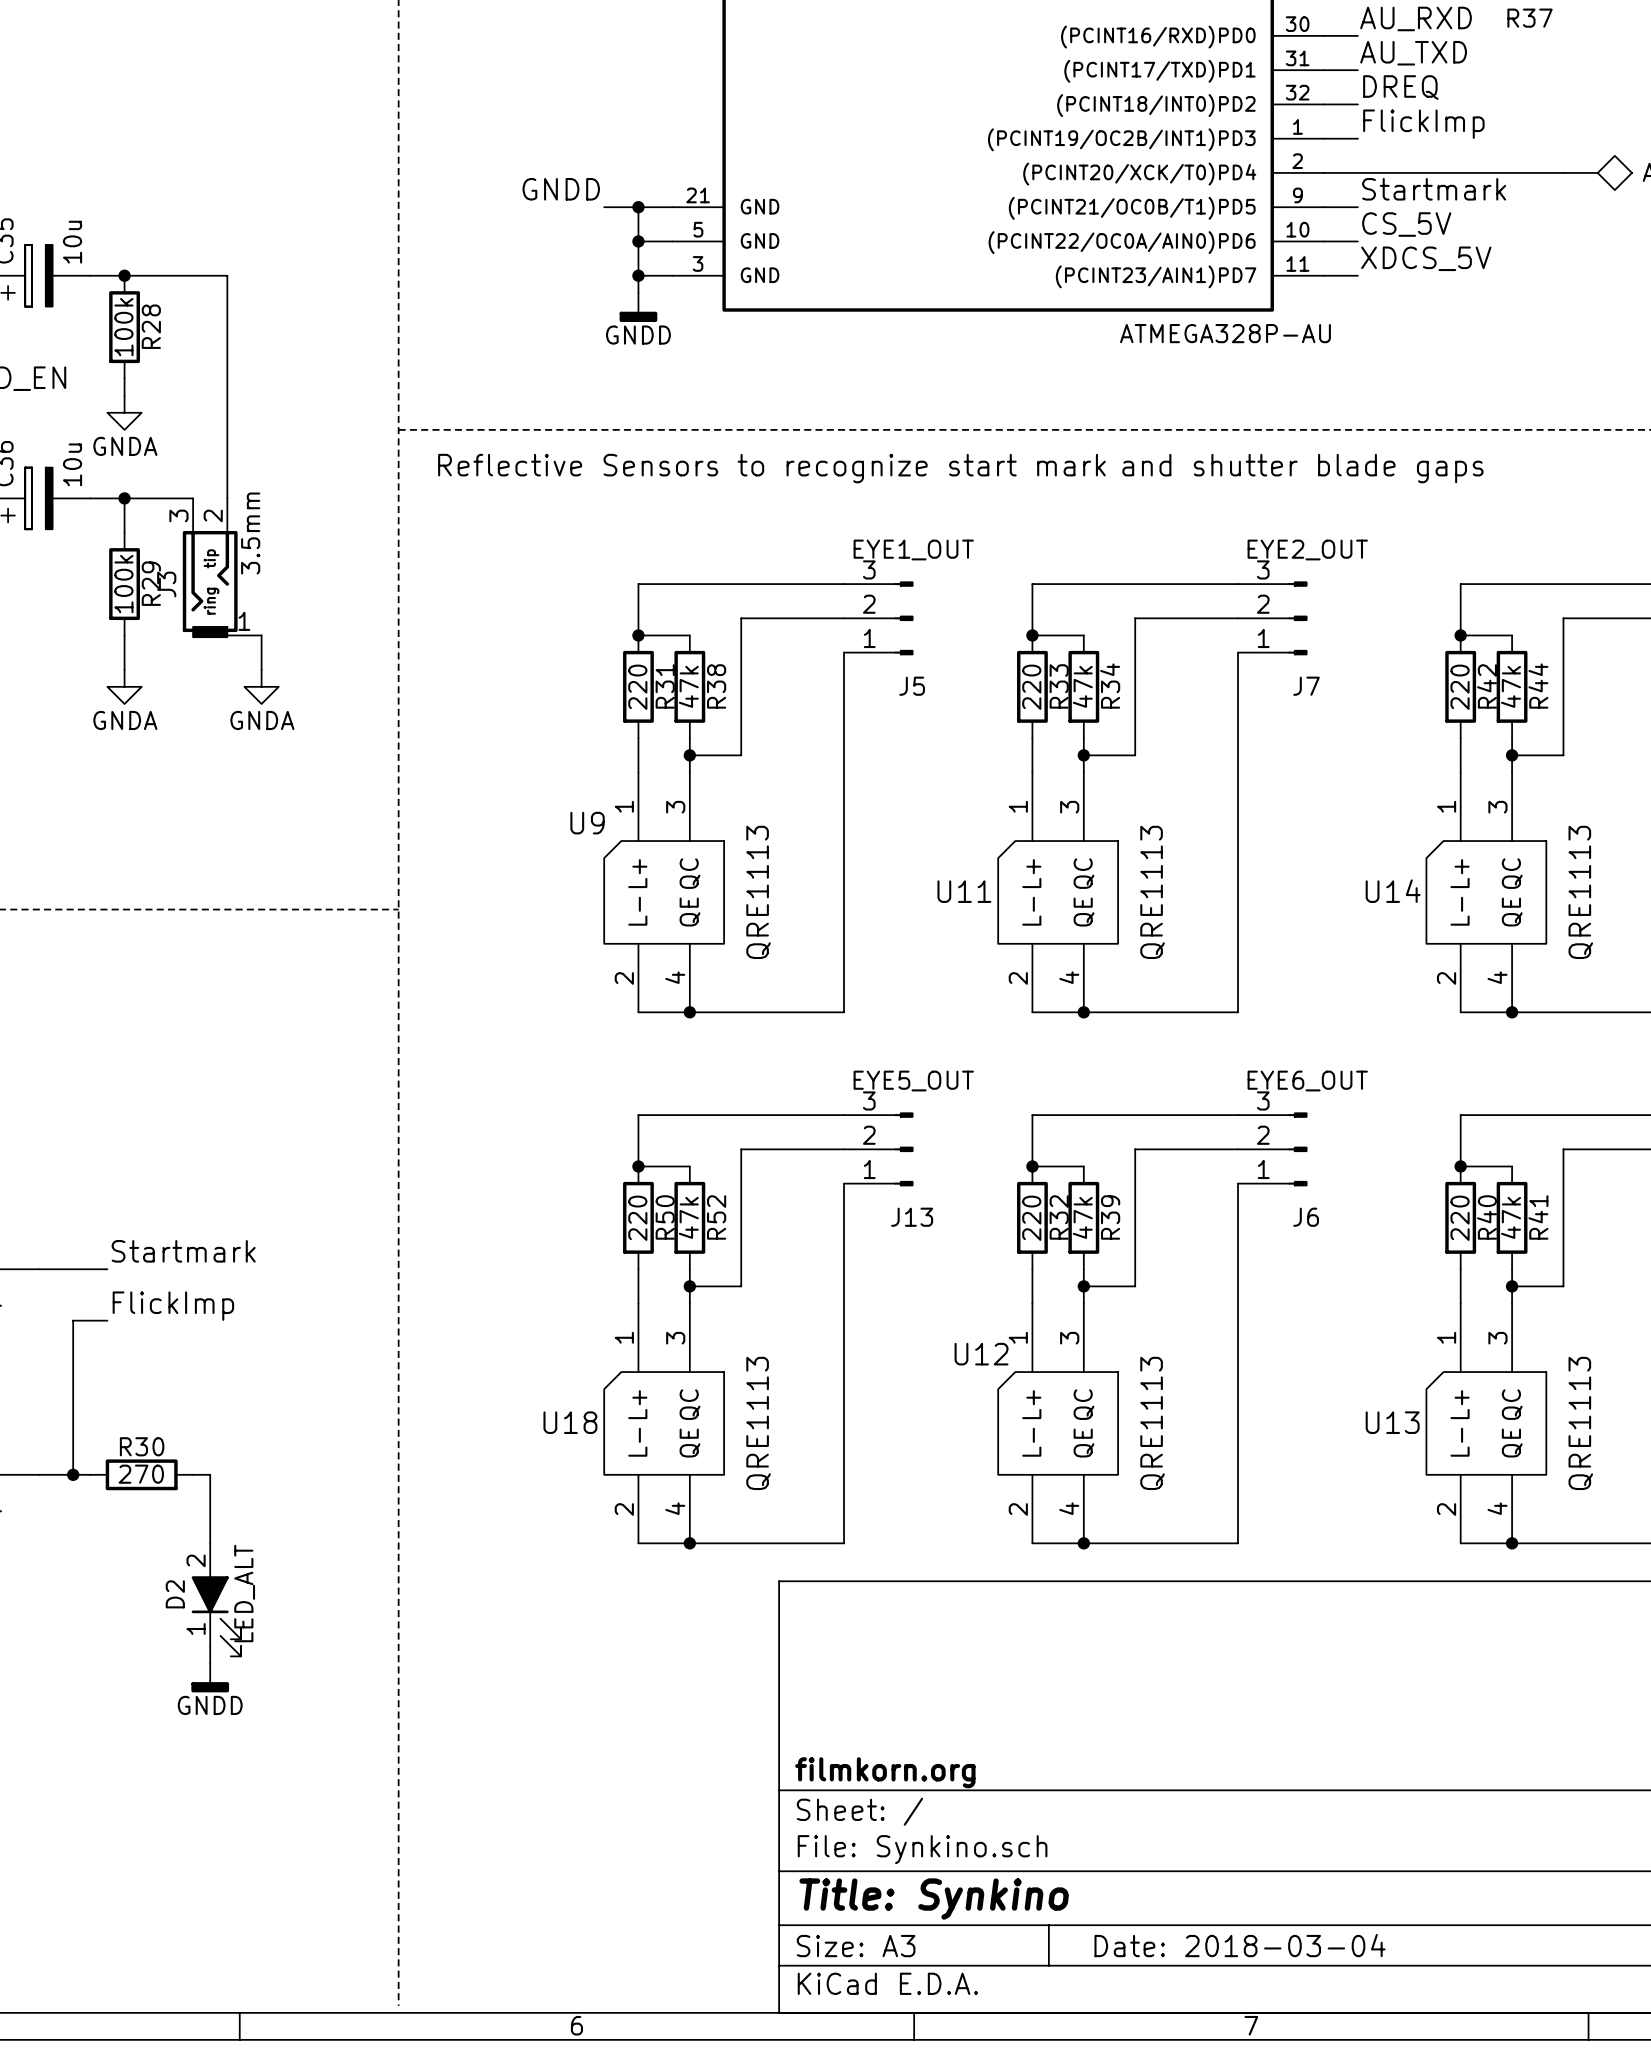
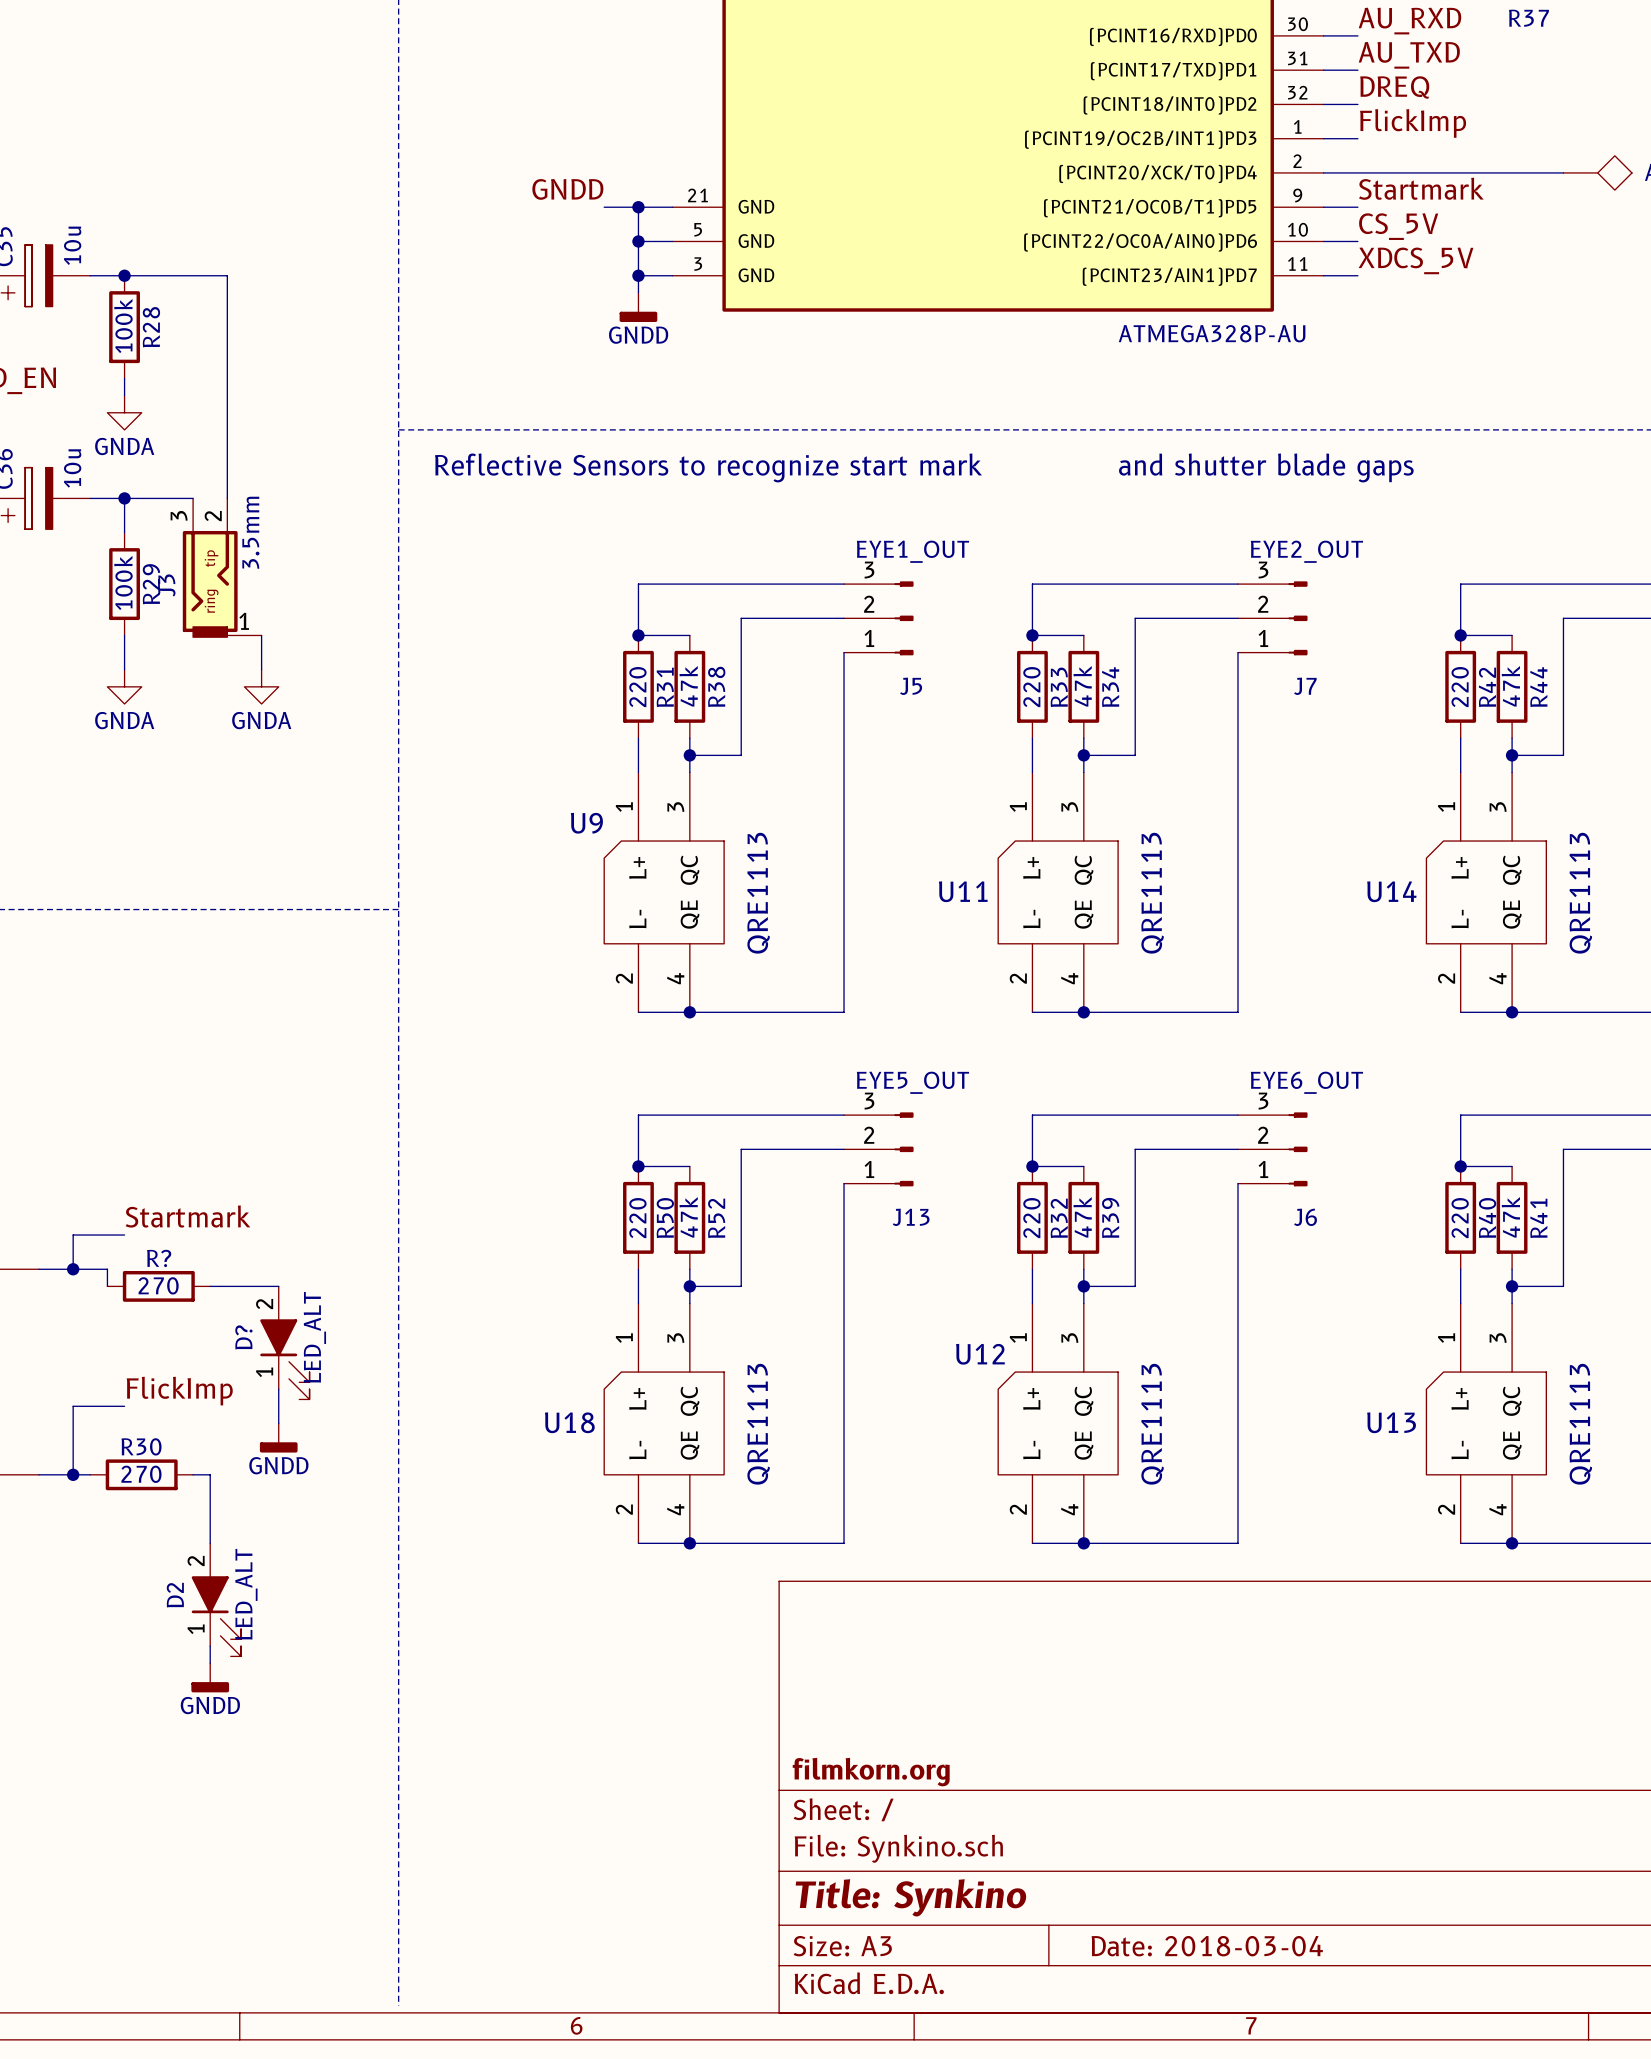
wire: none -> (124, 1235) (73, 1235) (73, 1269)
label position: Startmark (183, 1251) -> Startmark (188, 1216)
junction: none -> (73, 1269)
wire: none -> (107, 1269) (107, 1286)
R?: none -> 270 (158, 1286)
wire: none -> (210, 1286) (278, 1286)
label position: FlickImp (173, 1306) -> FlickImp (179, 1391)
wire: (107, 1320) (73, 1320) (73, 1406) -> (124, 1406) (73, 1406)
D?: none -> LED_ALT (284, 1342)
wire: none -> (278, 1389) (278, 1423)
power symbol: none -> GNDD (278, 1437)

